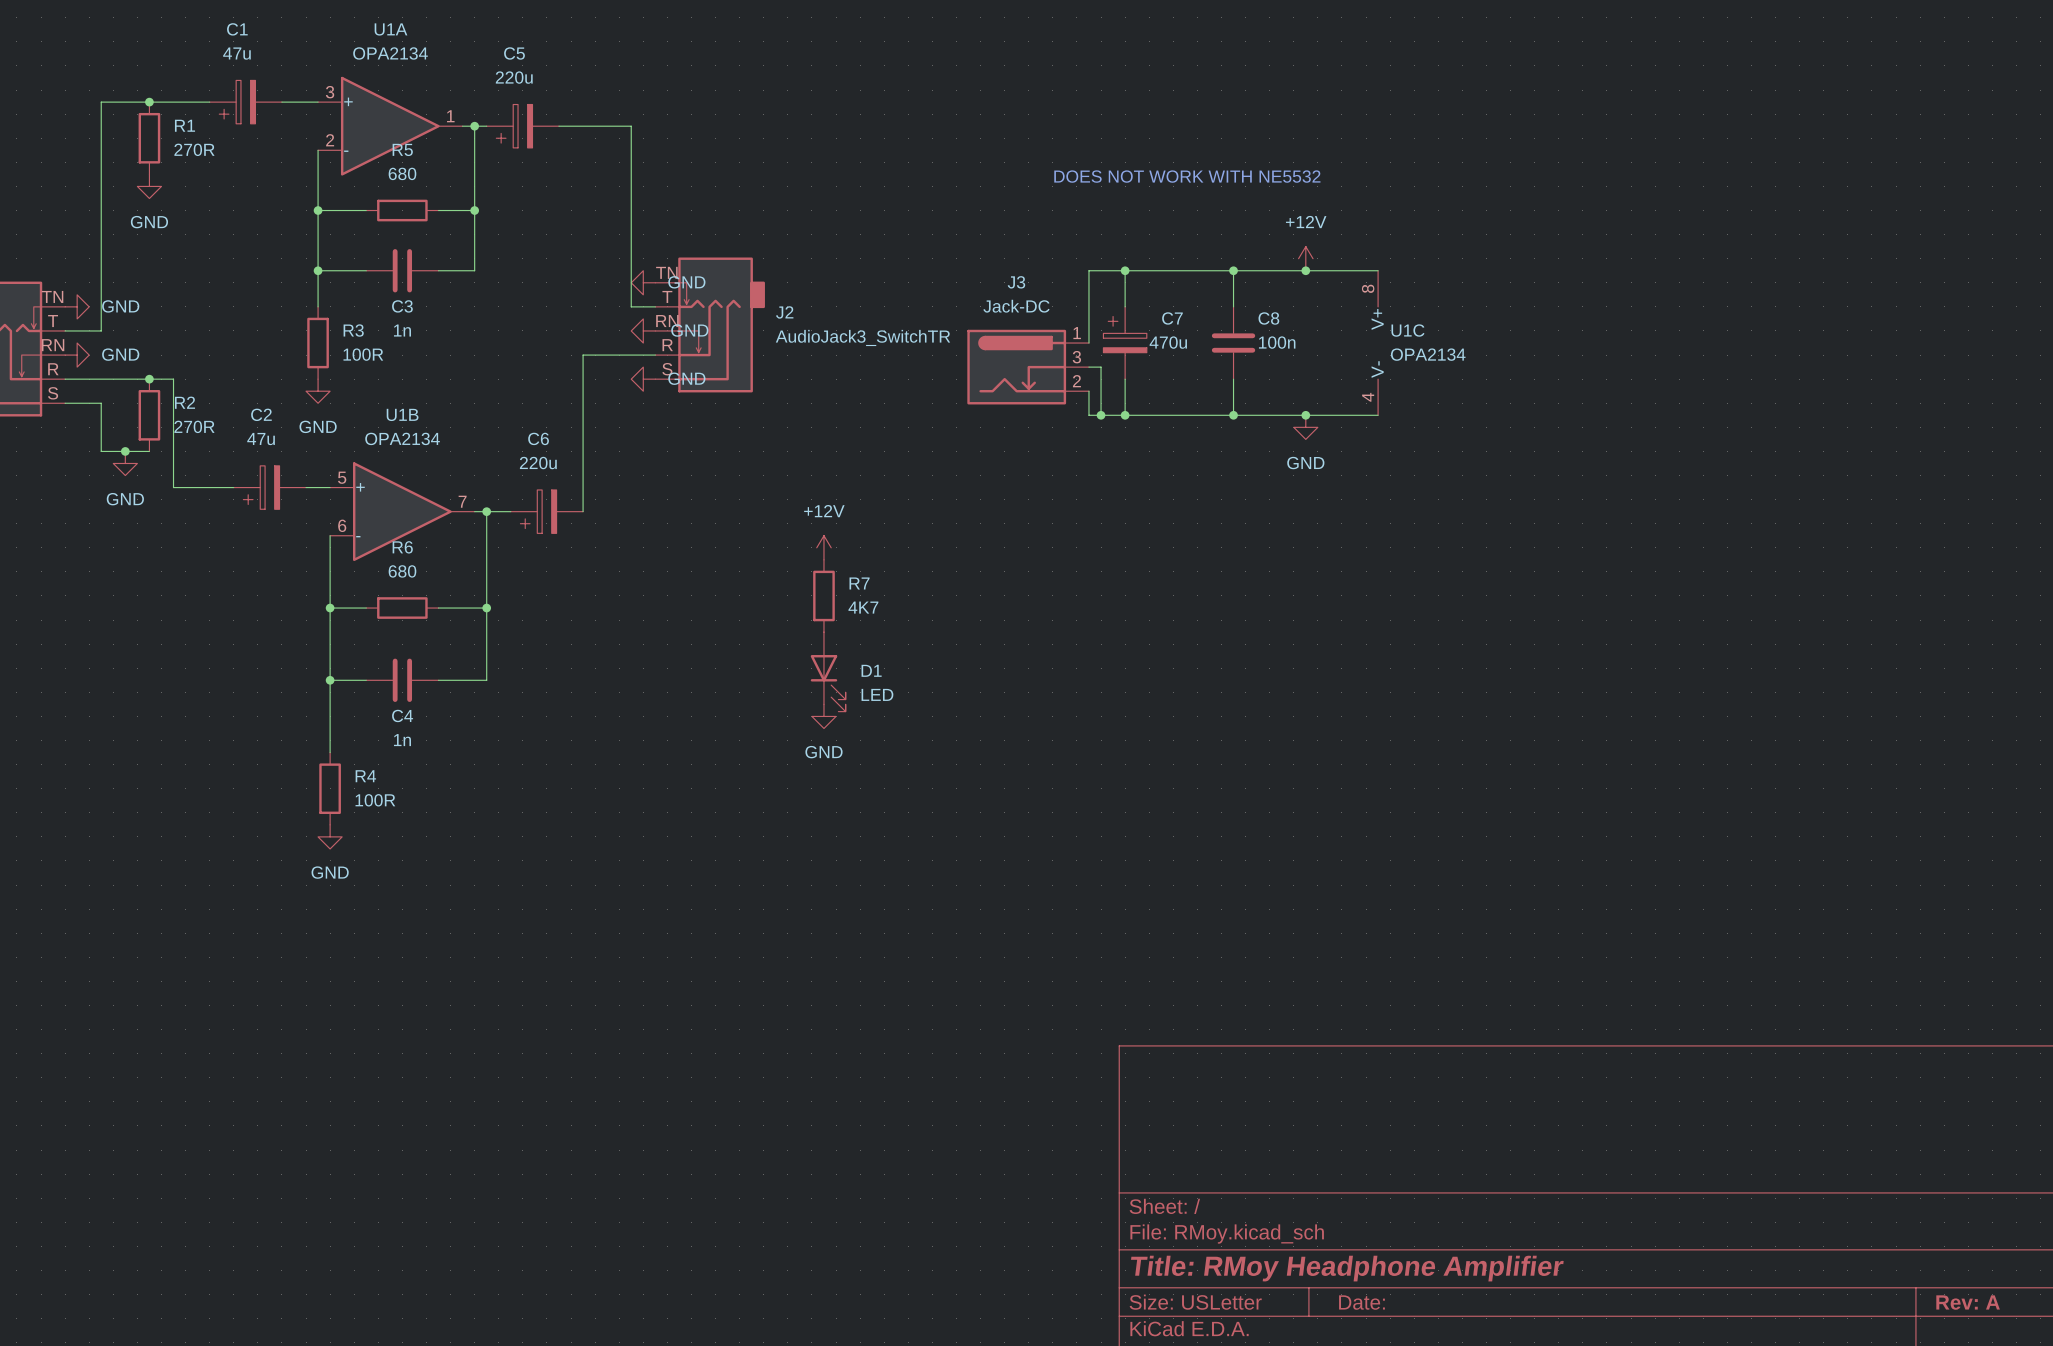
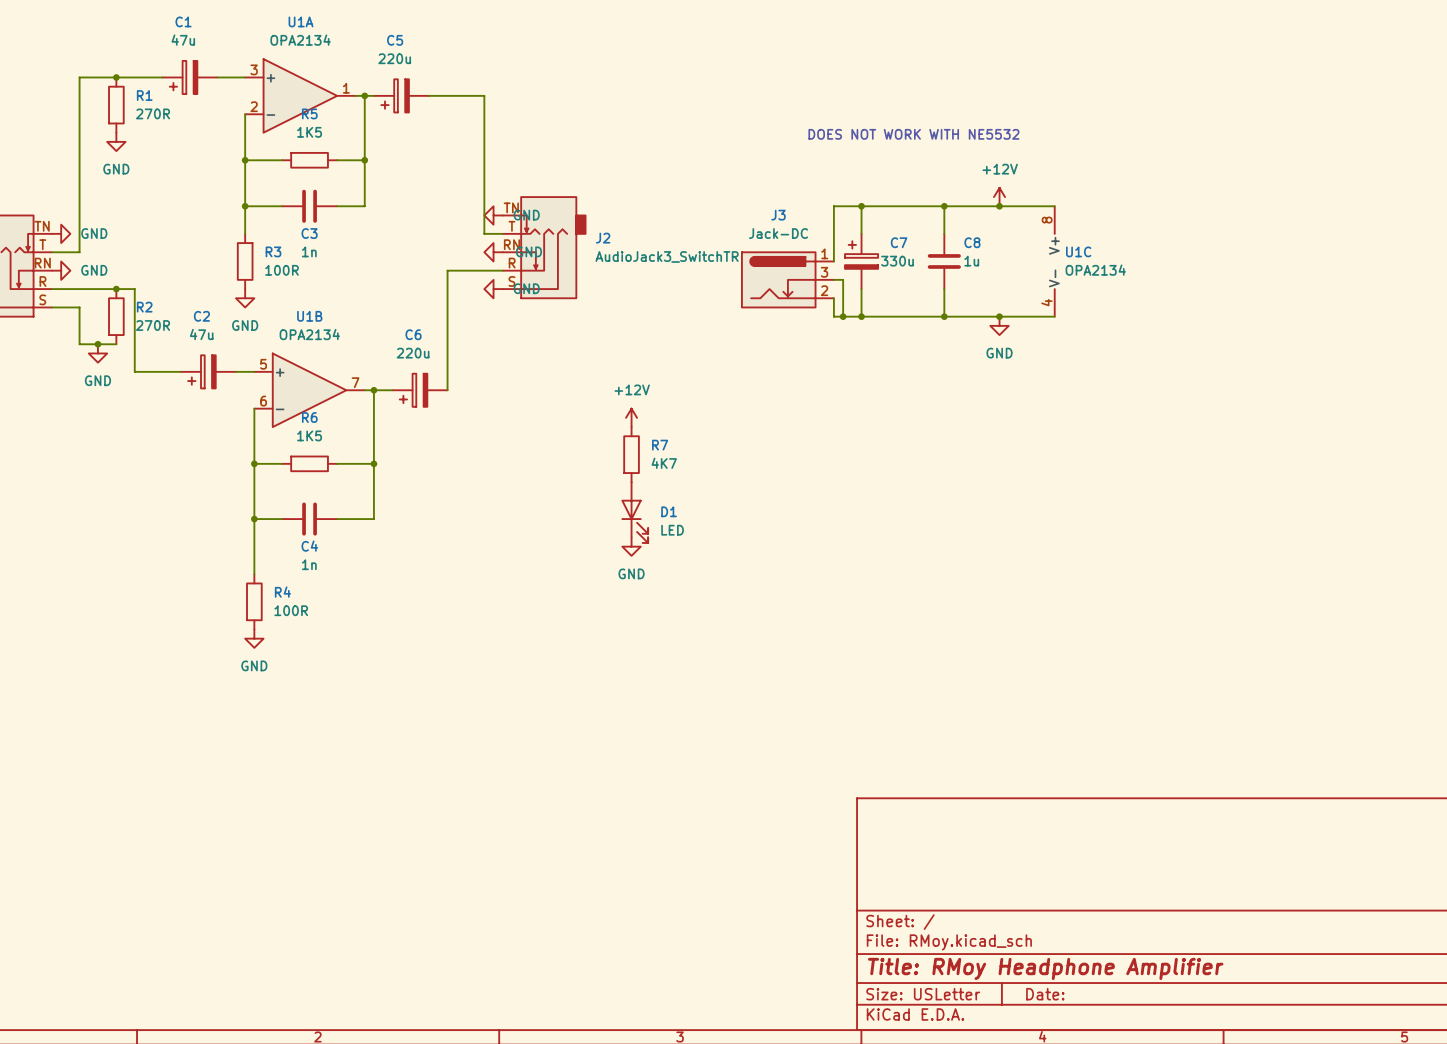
R5 value: 680 (402, 173) -> 1K5 (309, 132)
C7 value: 470u (1168, 342) -> 330u (897, 261)
C8 value: 100n (1277, 342) -> 1u (971, 261)
R6 value: 680 (402, 571) -> 1K5 (309, 435)

